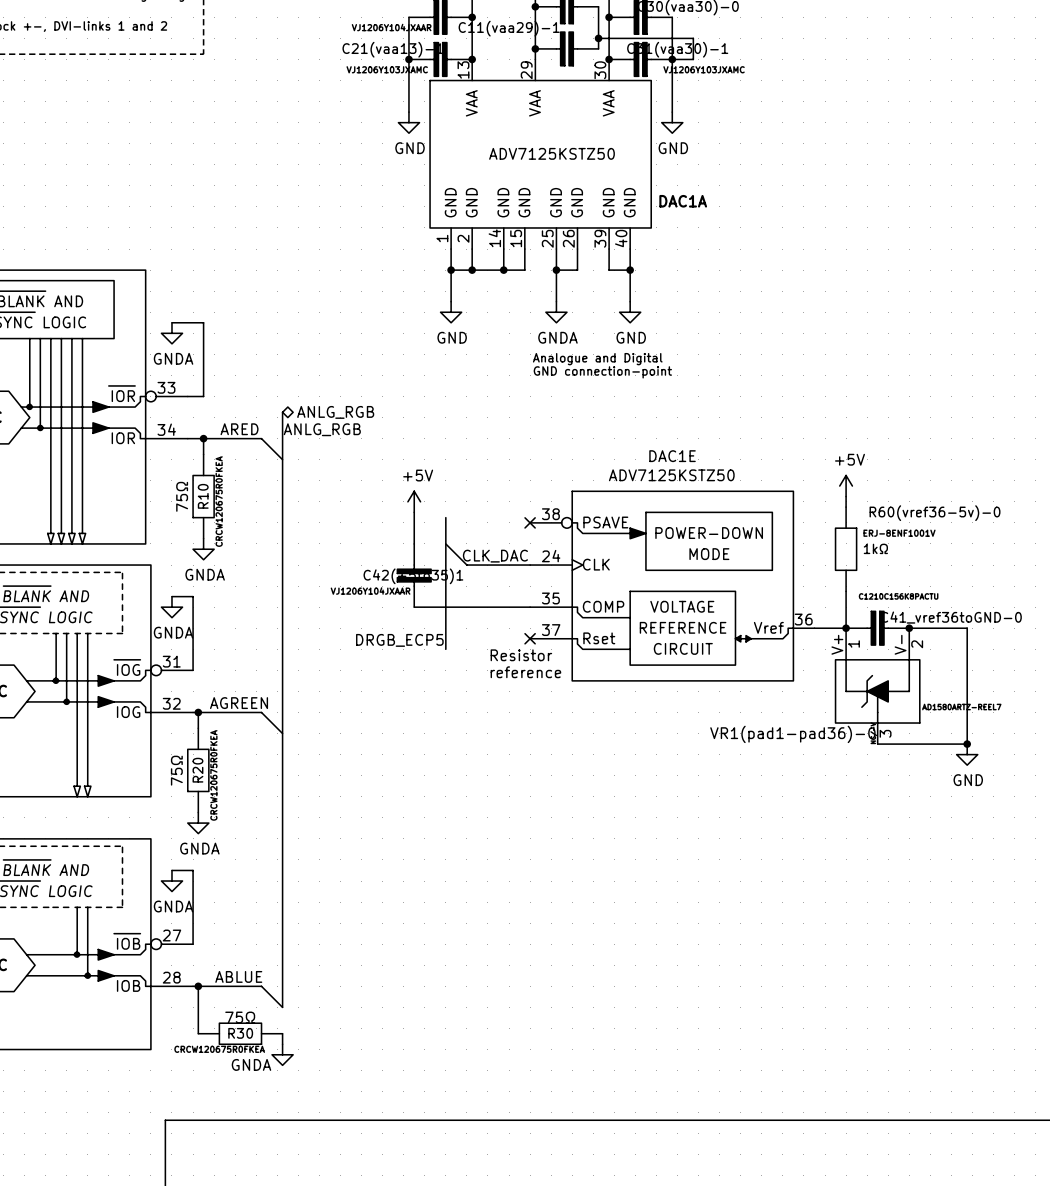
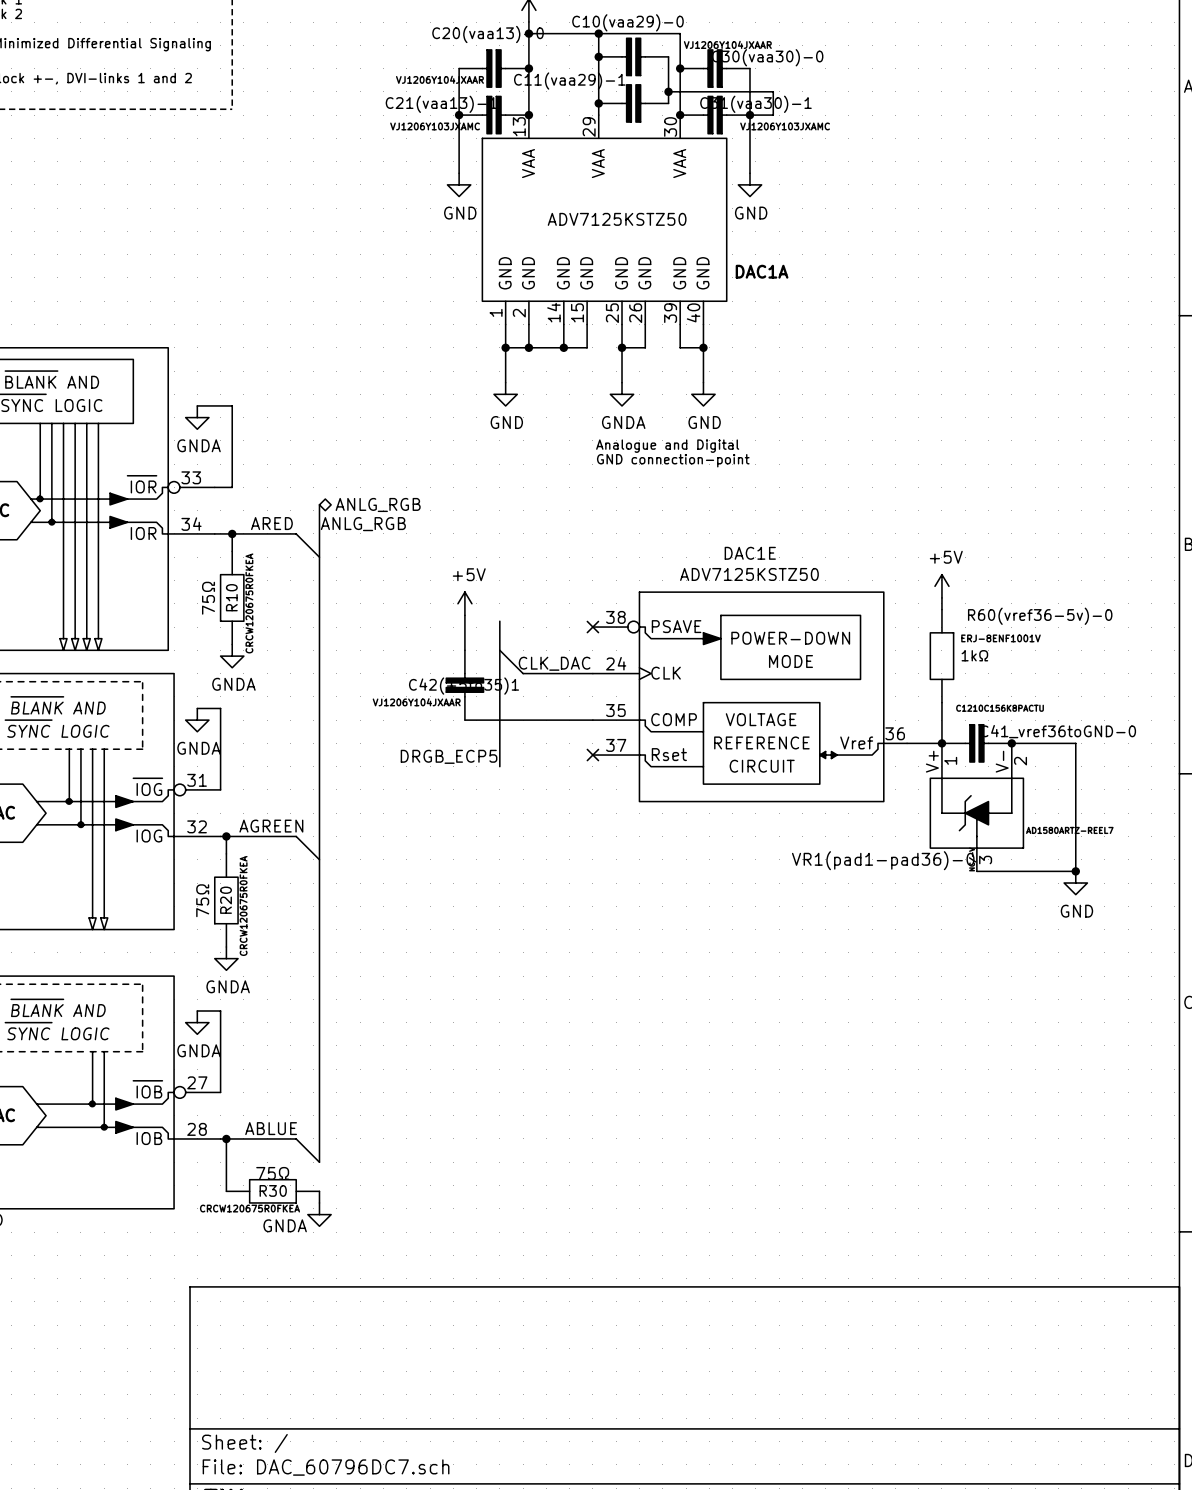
text: Resistor (521, 655) -> none
text: reference (525, 672) -> none

